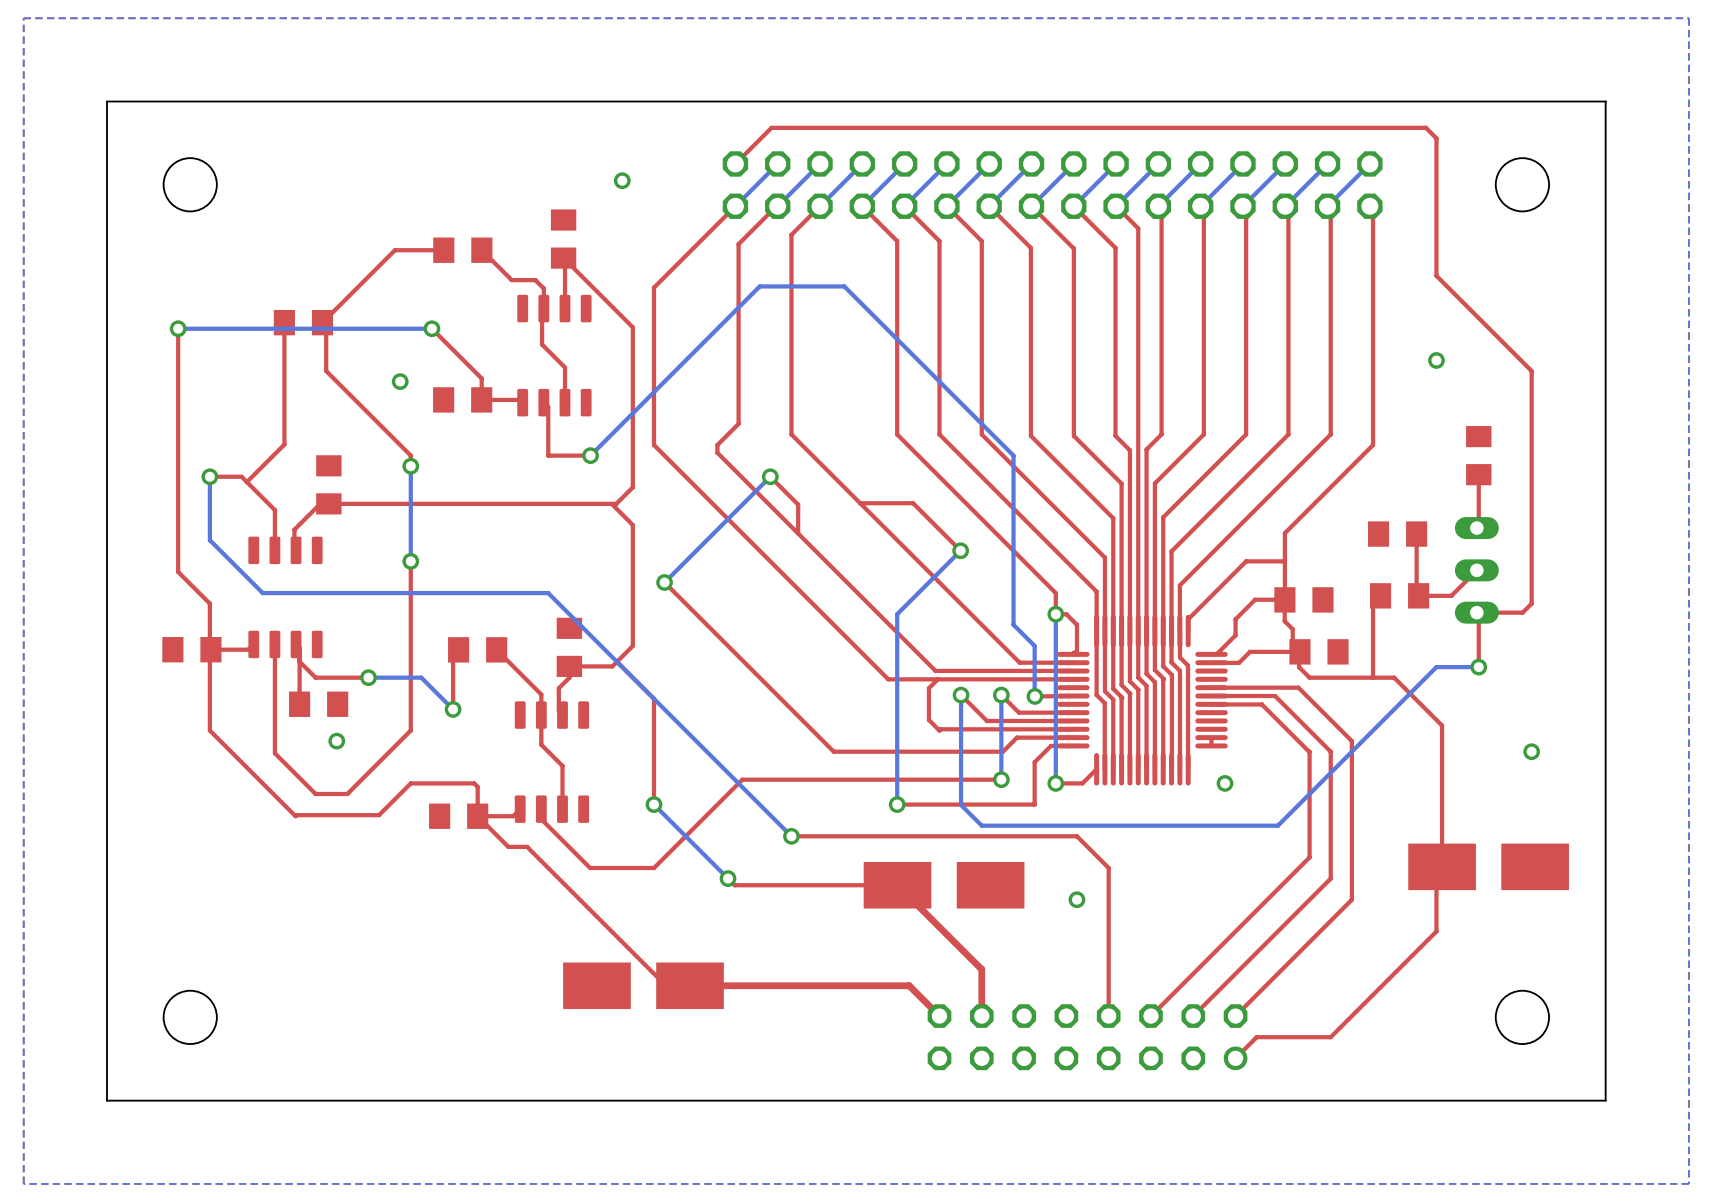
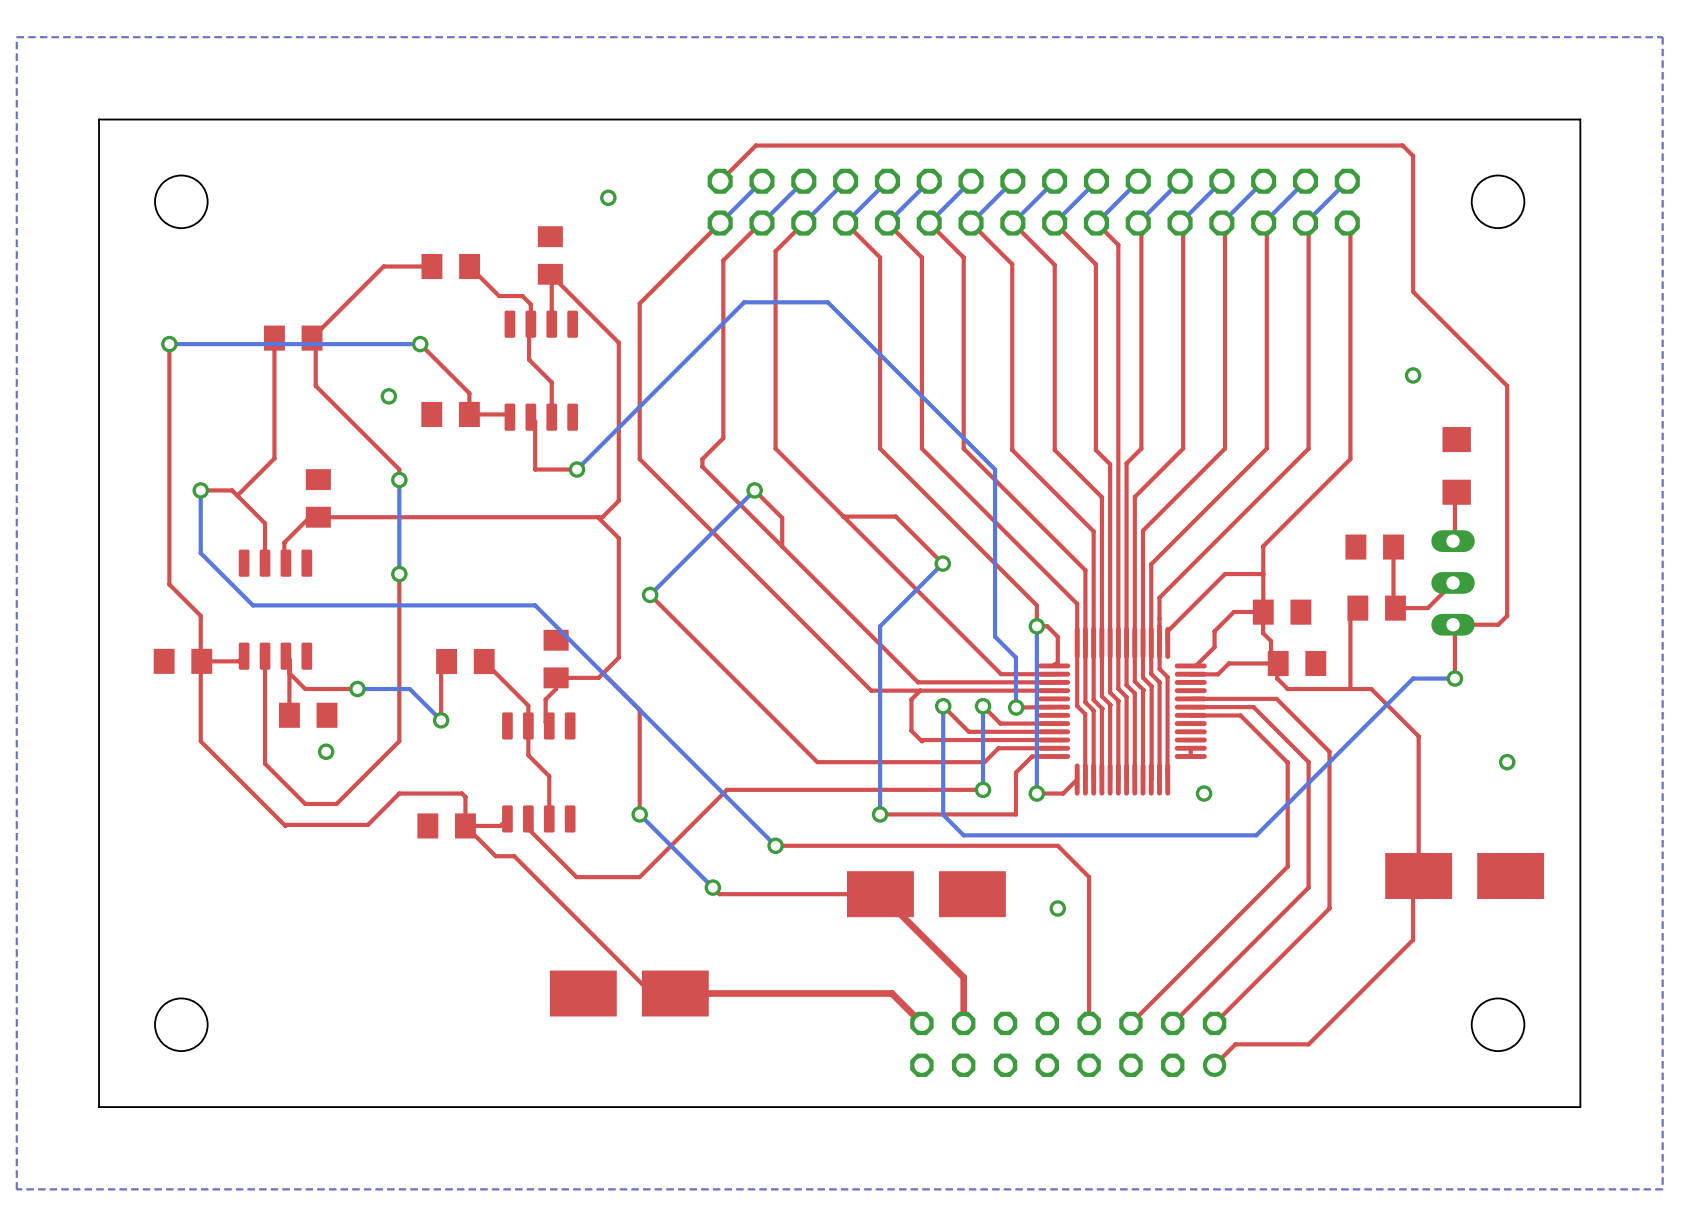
part footprint: [1466, 426, 1492, 486] -> [1442, 427, 1471, 505]

